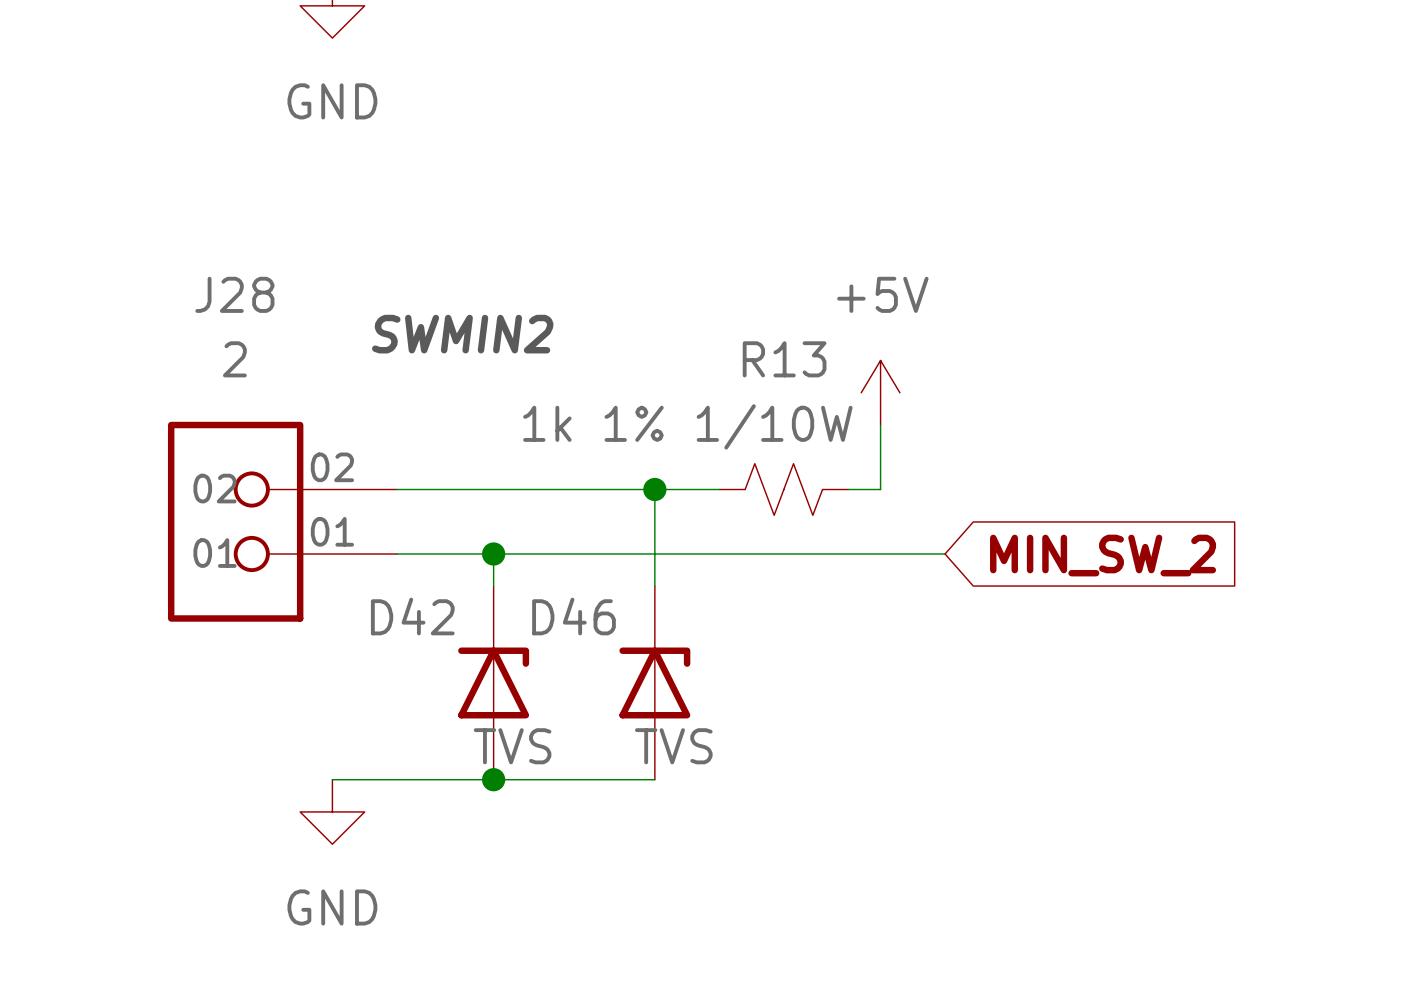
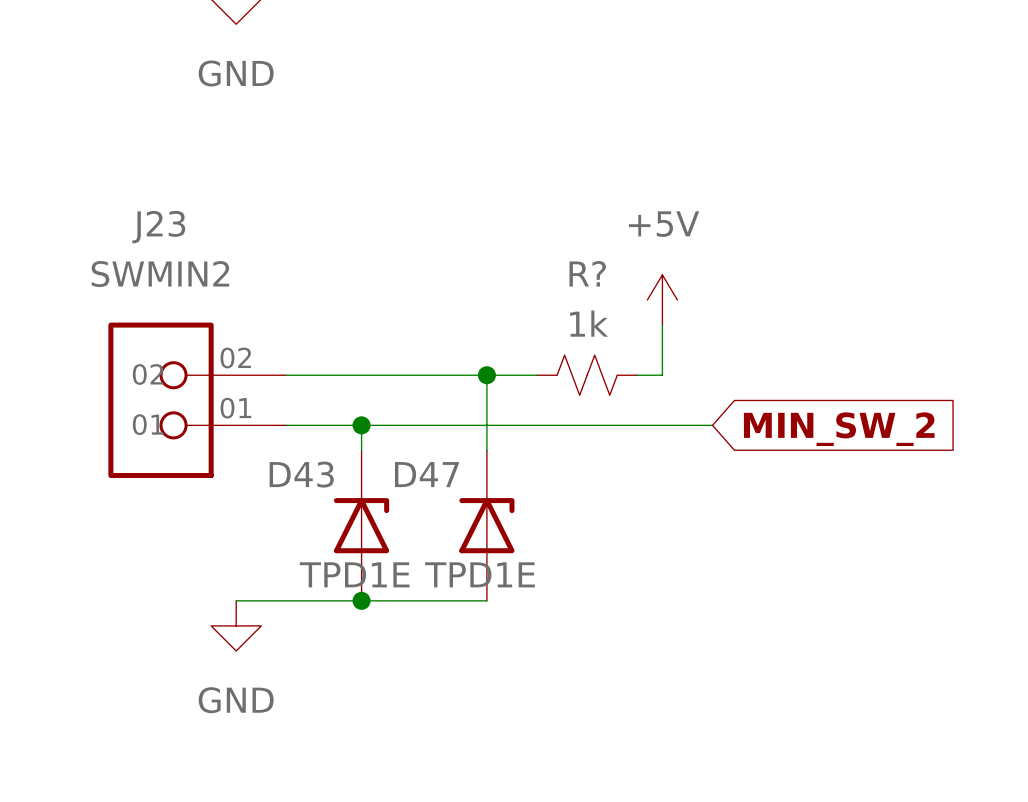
J28 name: J28 (234, 294) -> J23 (158, 227)
text: SWMIN2 (462, 334) -> none
J28 value: 2 (234, 359) -> SWMIN2 (160, 274)
R13 name: R13 (784, 359) -> R? (587, 273)
R13 value: 1k 1% 1/10W (687, 426) -> 1k (589, 323)
D42 name: D42 (412, 616) -> D43 (301, 474)
D46 name: D46 (574, 616) -> D47 (426, 474)
D42 value: TVS (512, 746) -> TPD1E (354, 574)
D46 value: TVS (673, 746) -> TPD1E (479, 574)

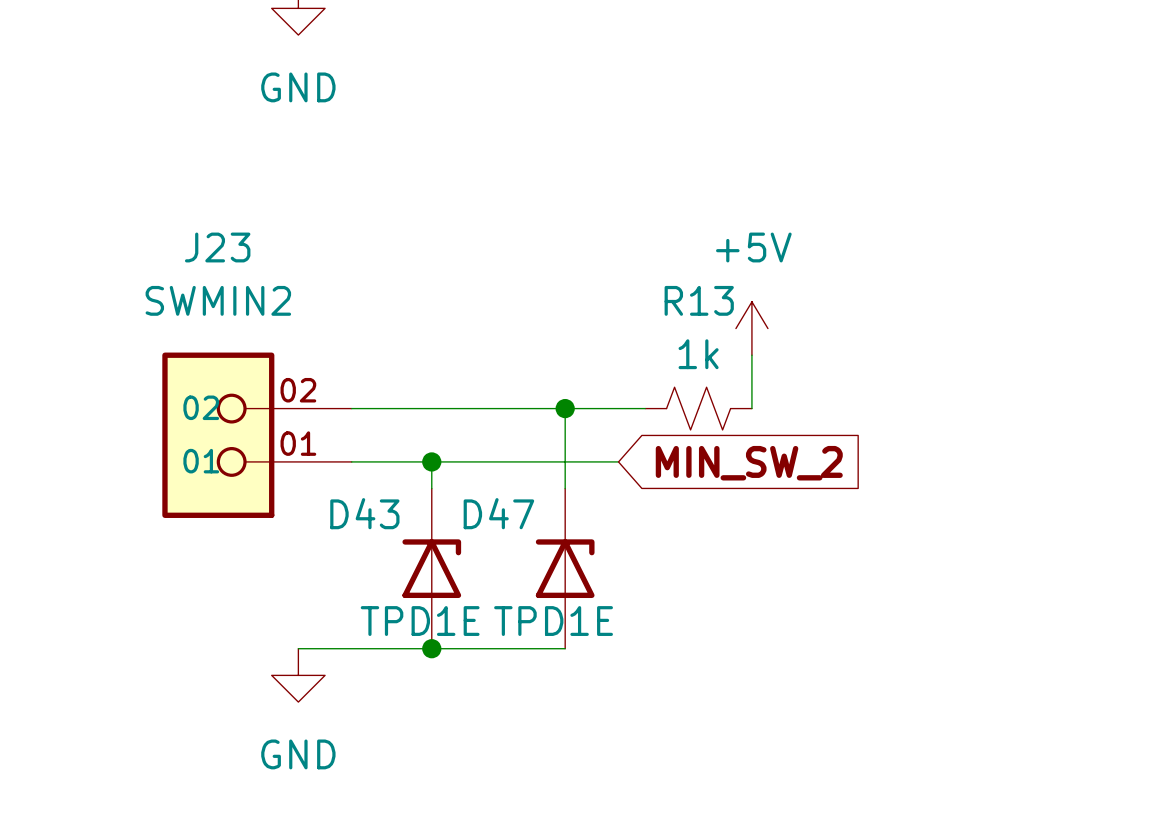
R?: 1k (587, 375) -> none
R13: none -> 1k (698, 408)
wire: (537, 425) (712, 425) -> none
global label position: MIN_SW_2 (839, 429) -> MIN_SW_2 (749, 463)

